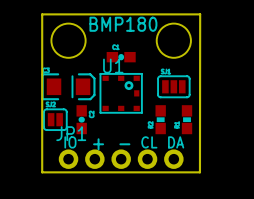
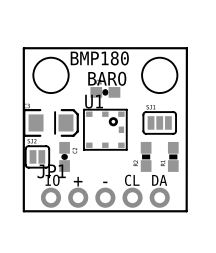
text: none -> BARO (107, 78)

